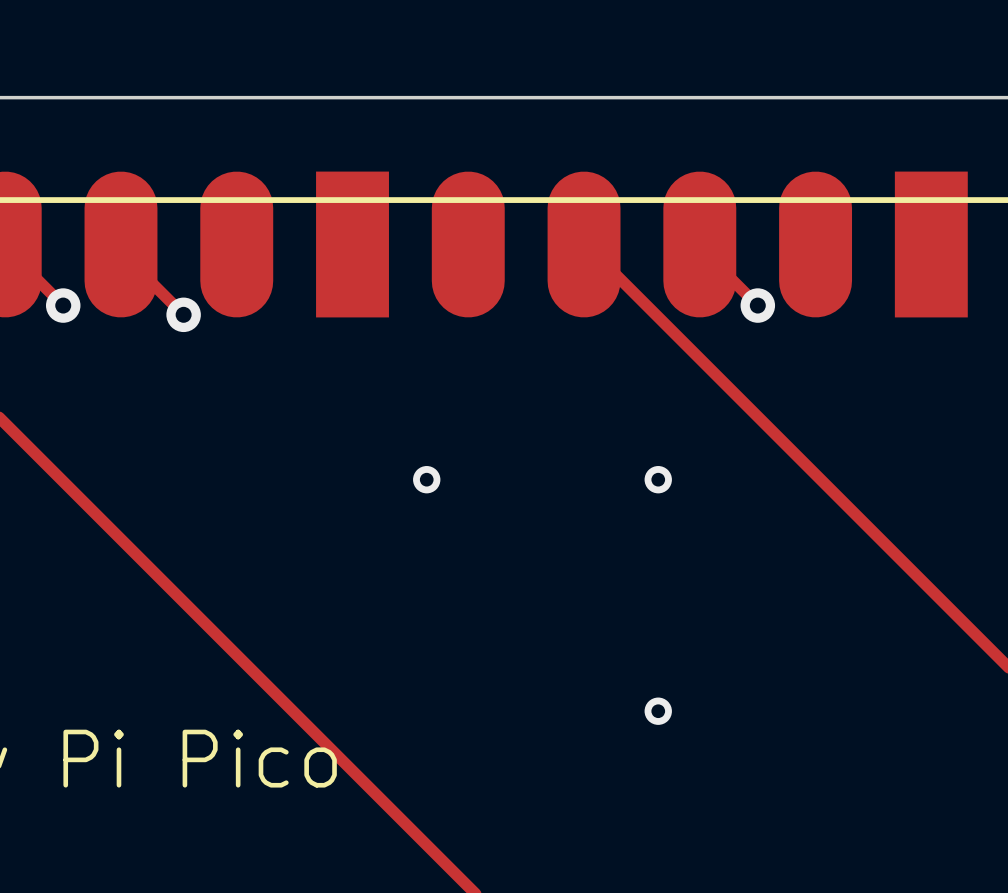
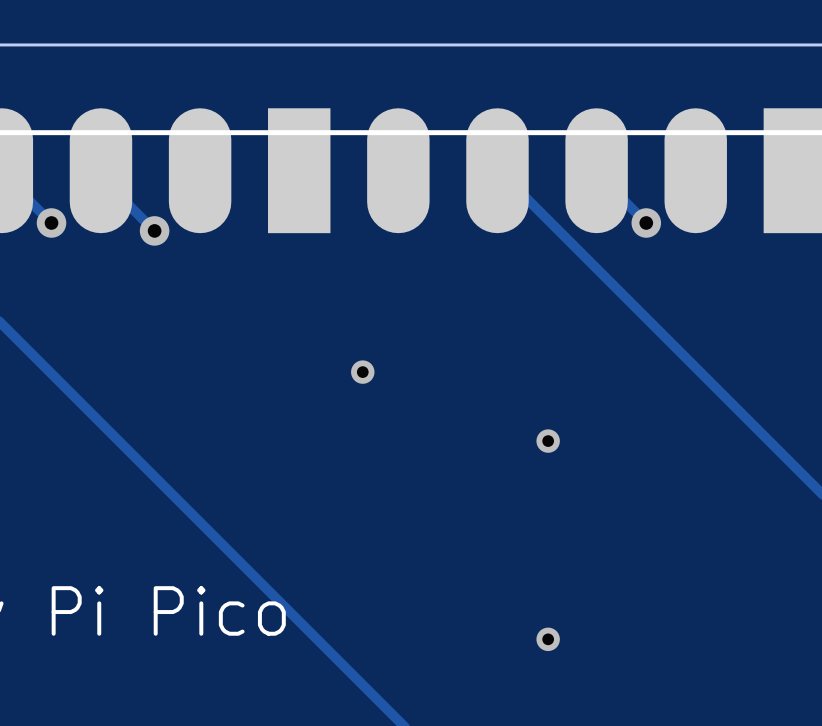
via: (658, 479) -> none
via: none -> (548, 441)
via: (658, 711) -> none
via: none -> (548, 639)

